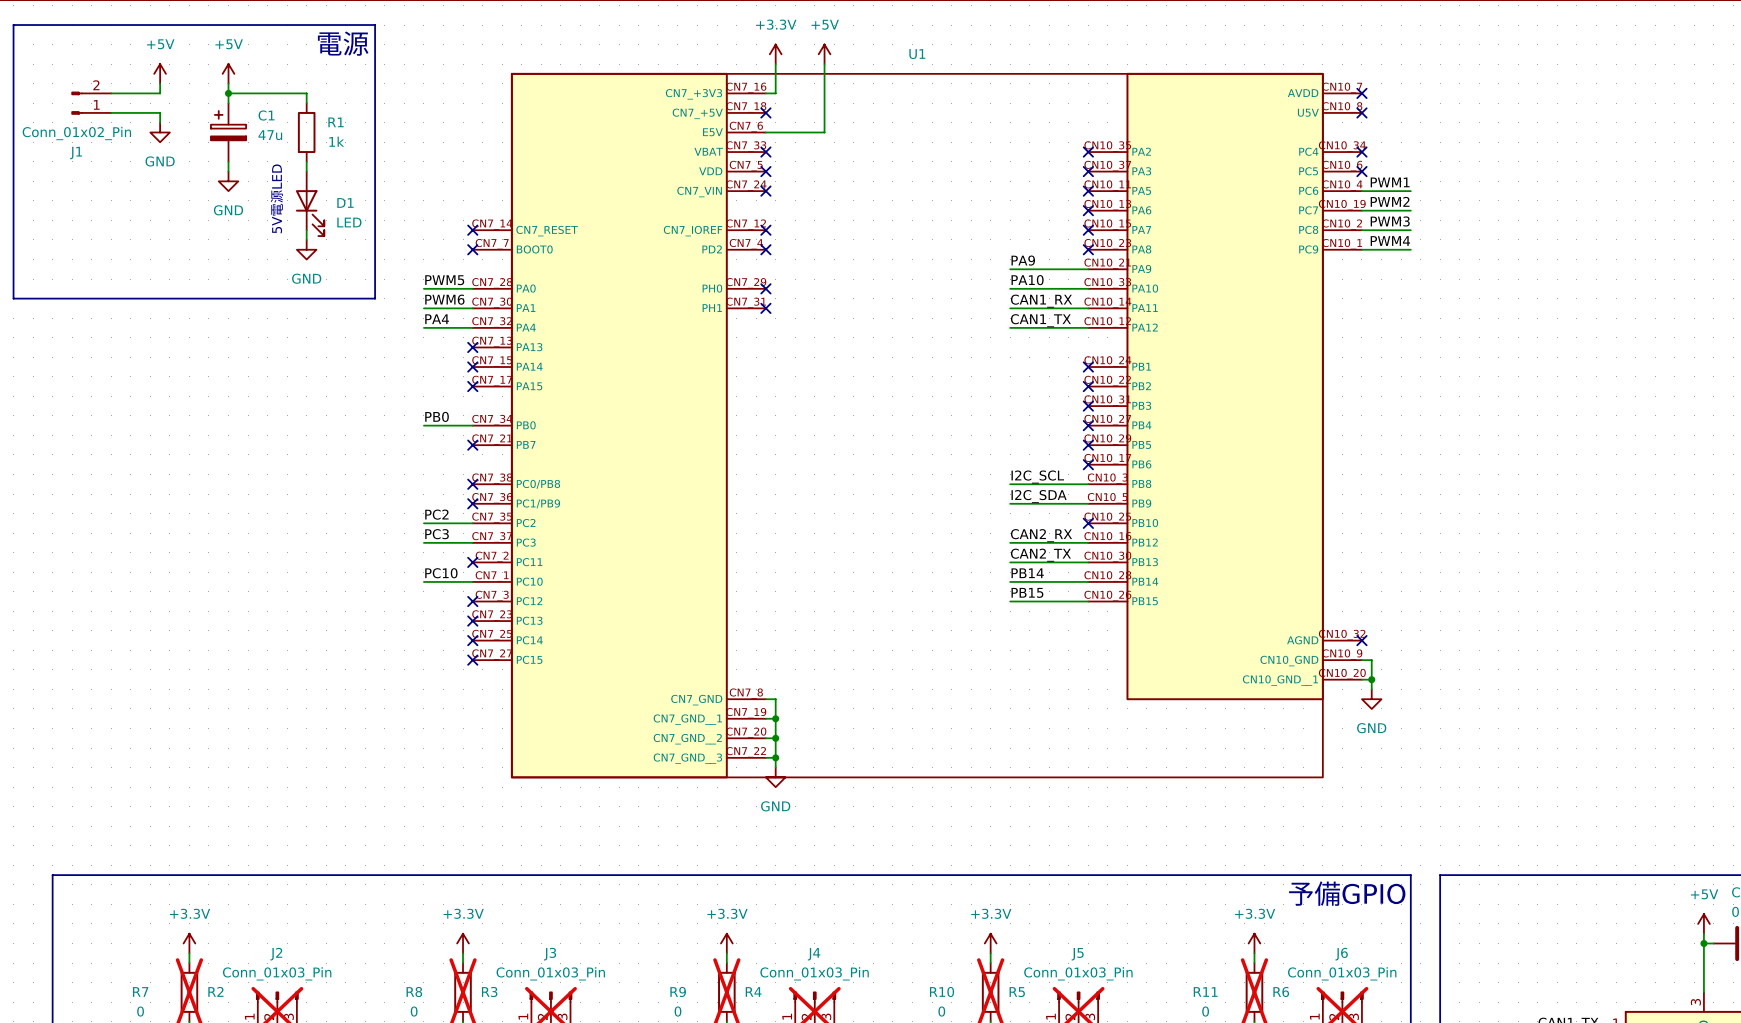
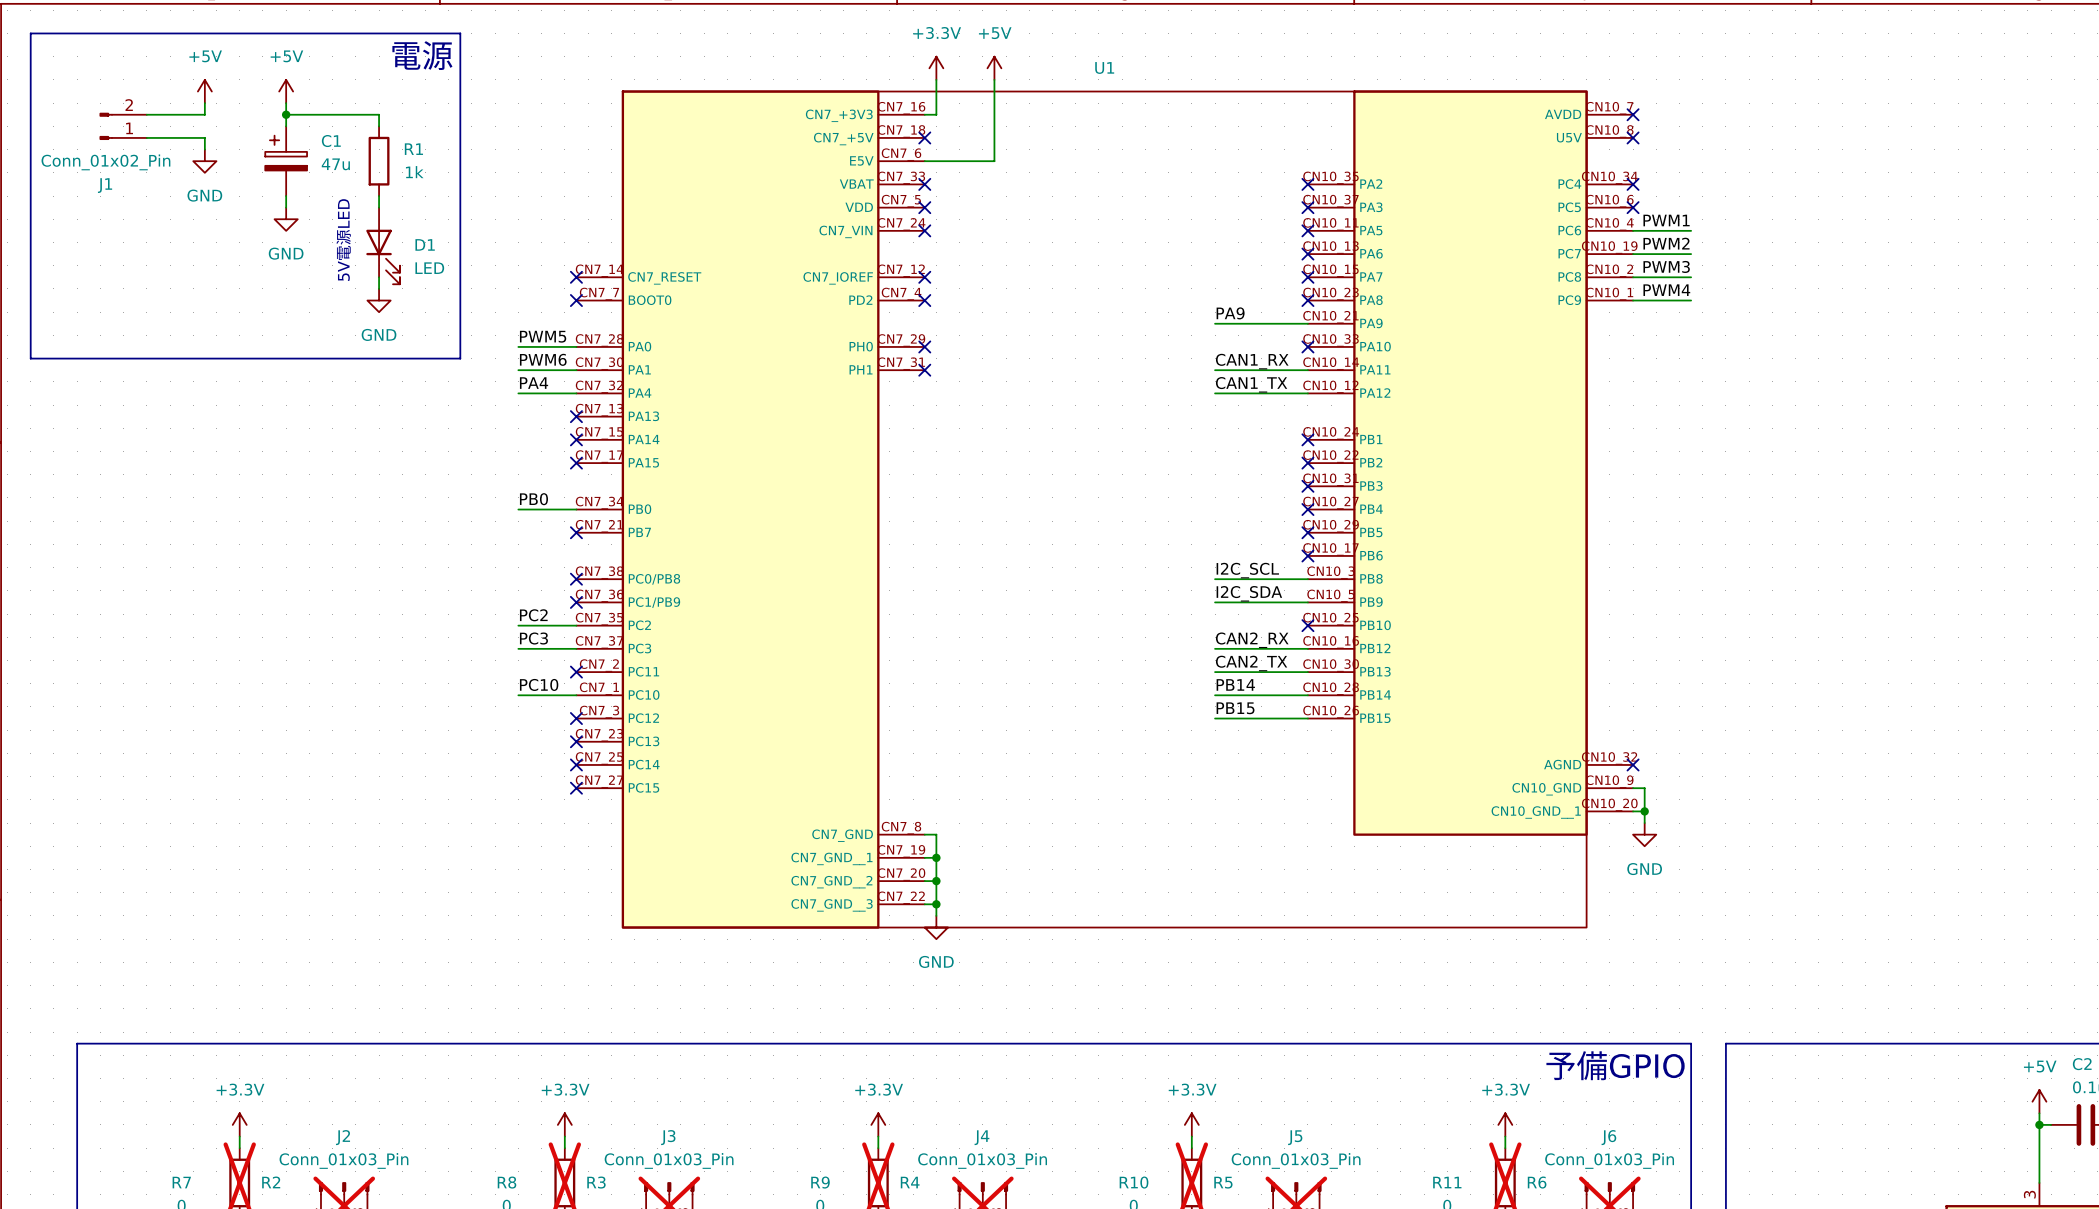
label: PA10 (1027, 280) -> none
wire: (1010, 288) (1088, 288) -> none
no-connect mark: none -> (1307, 346)

